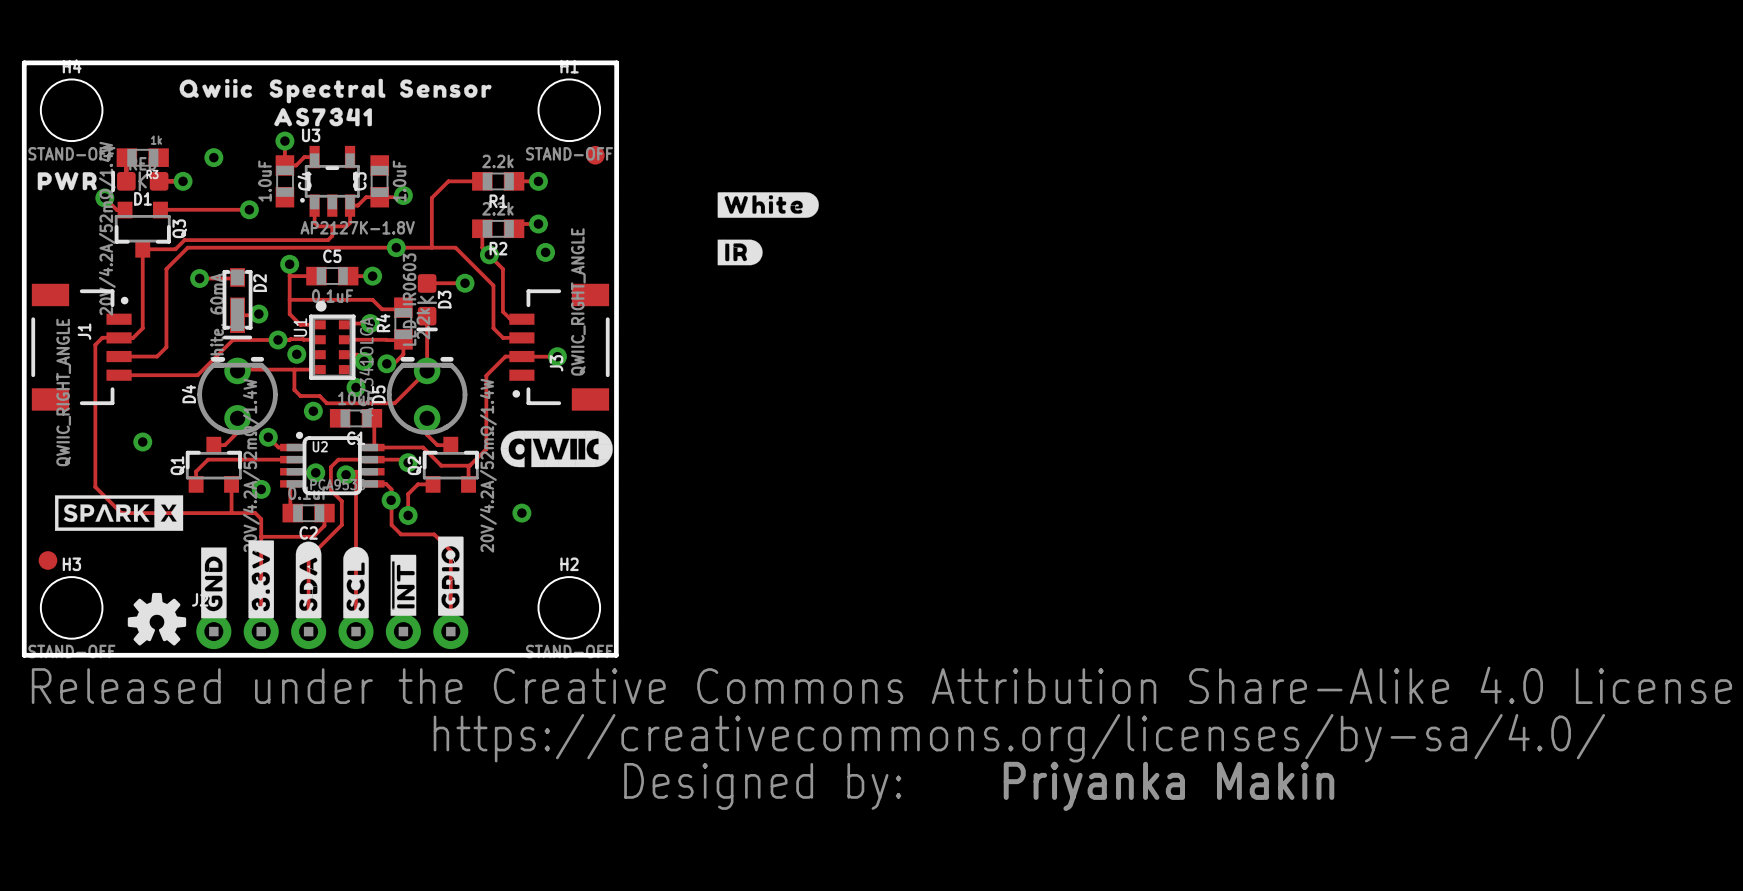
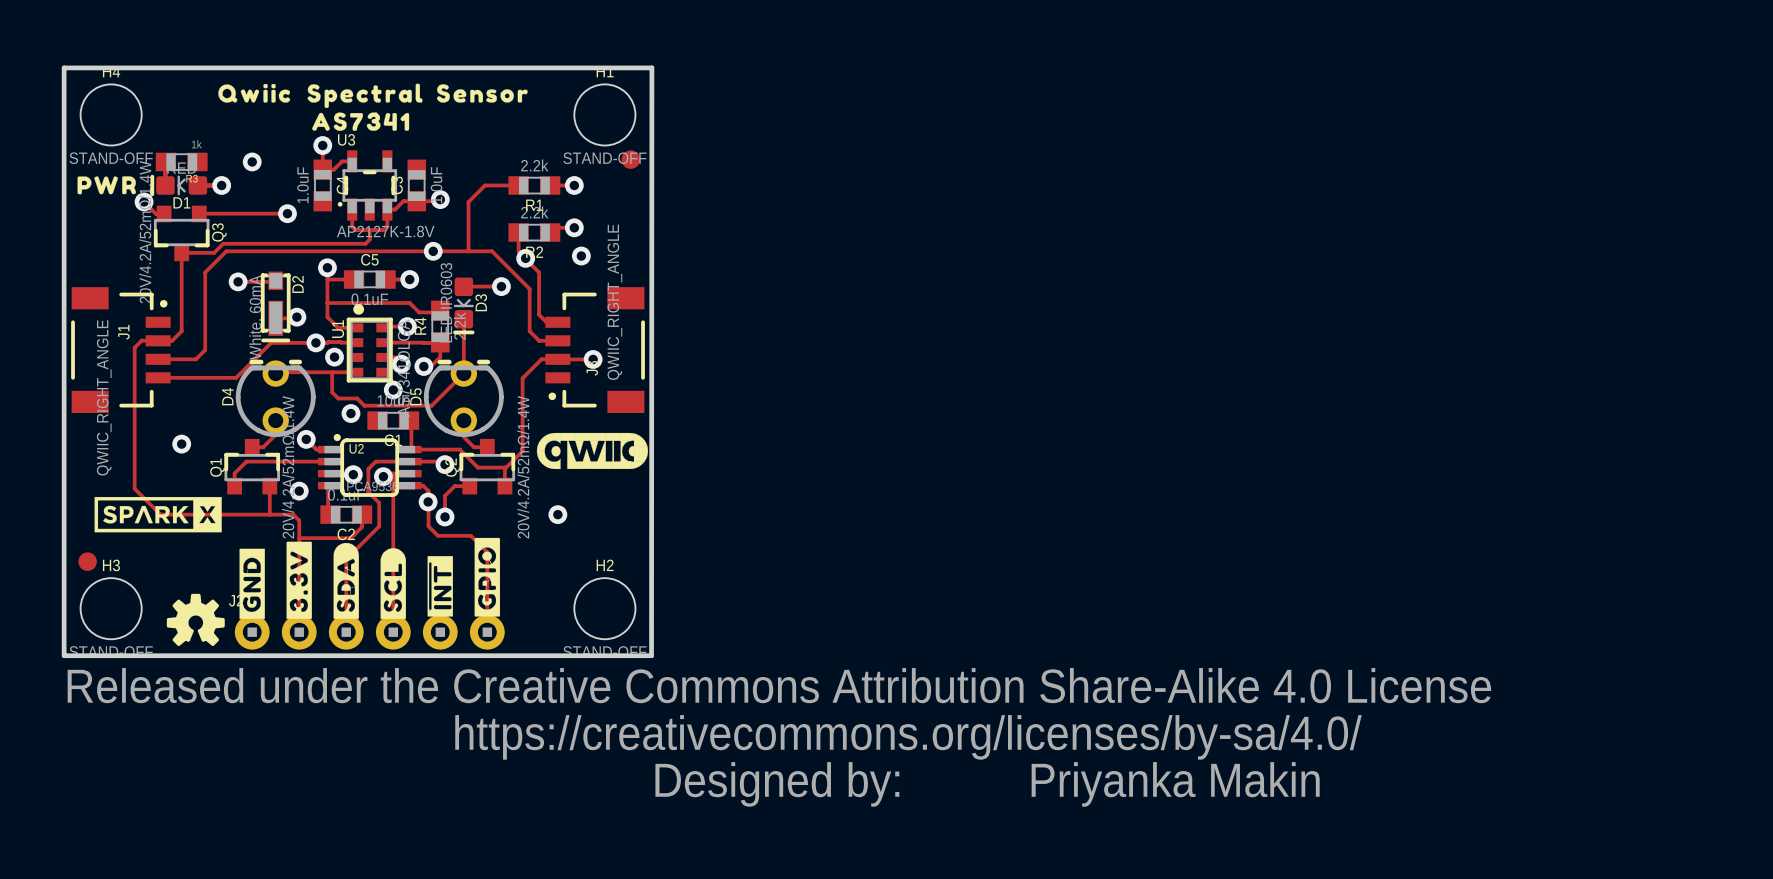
drawing: [717, 192, 819, 266] -> none

